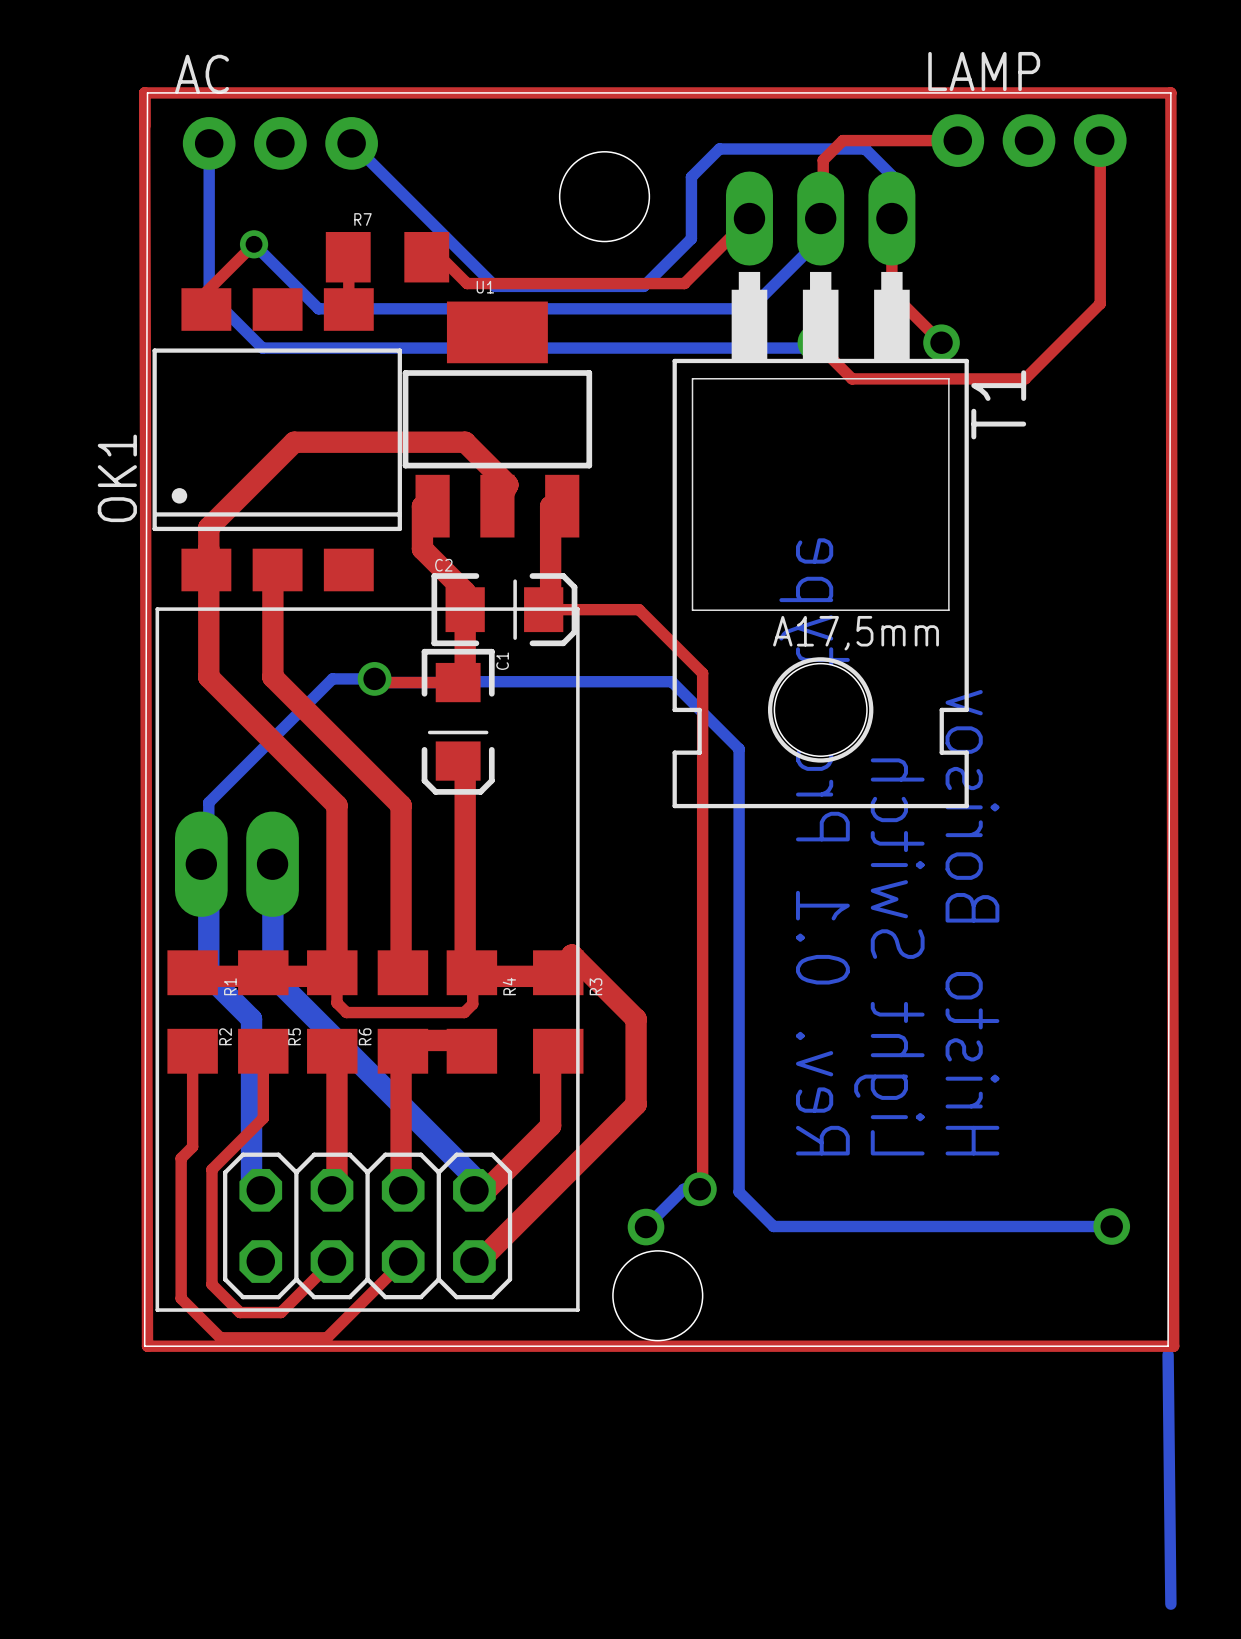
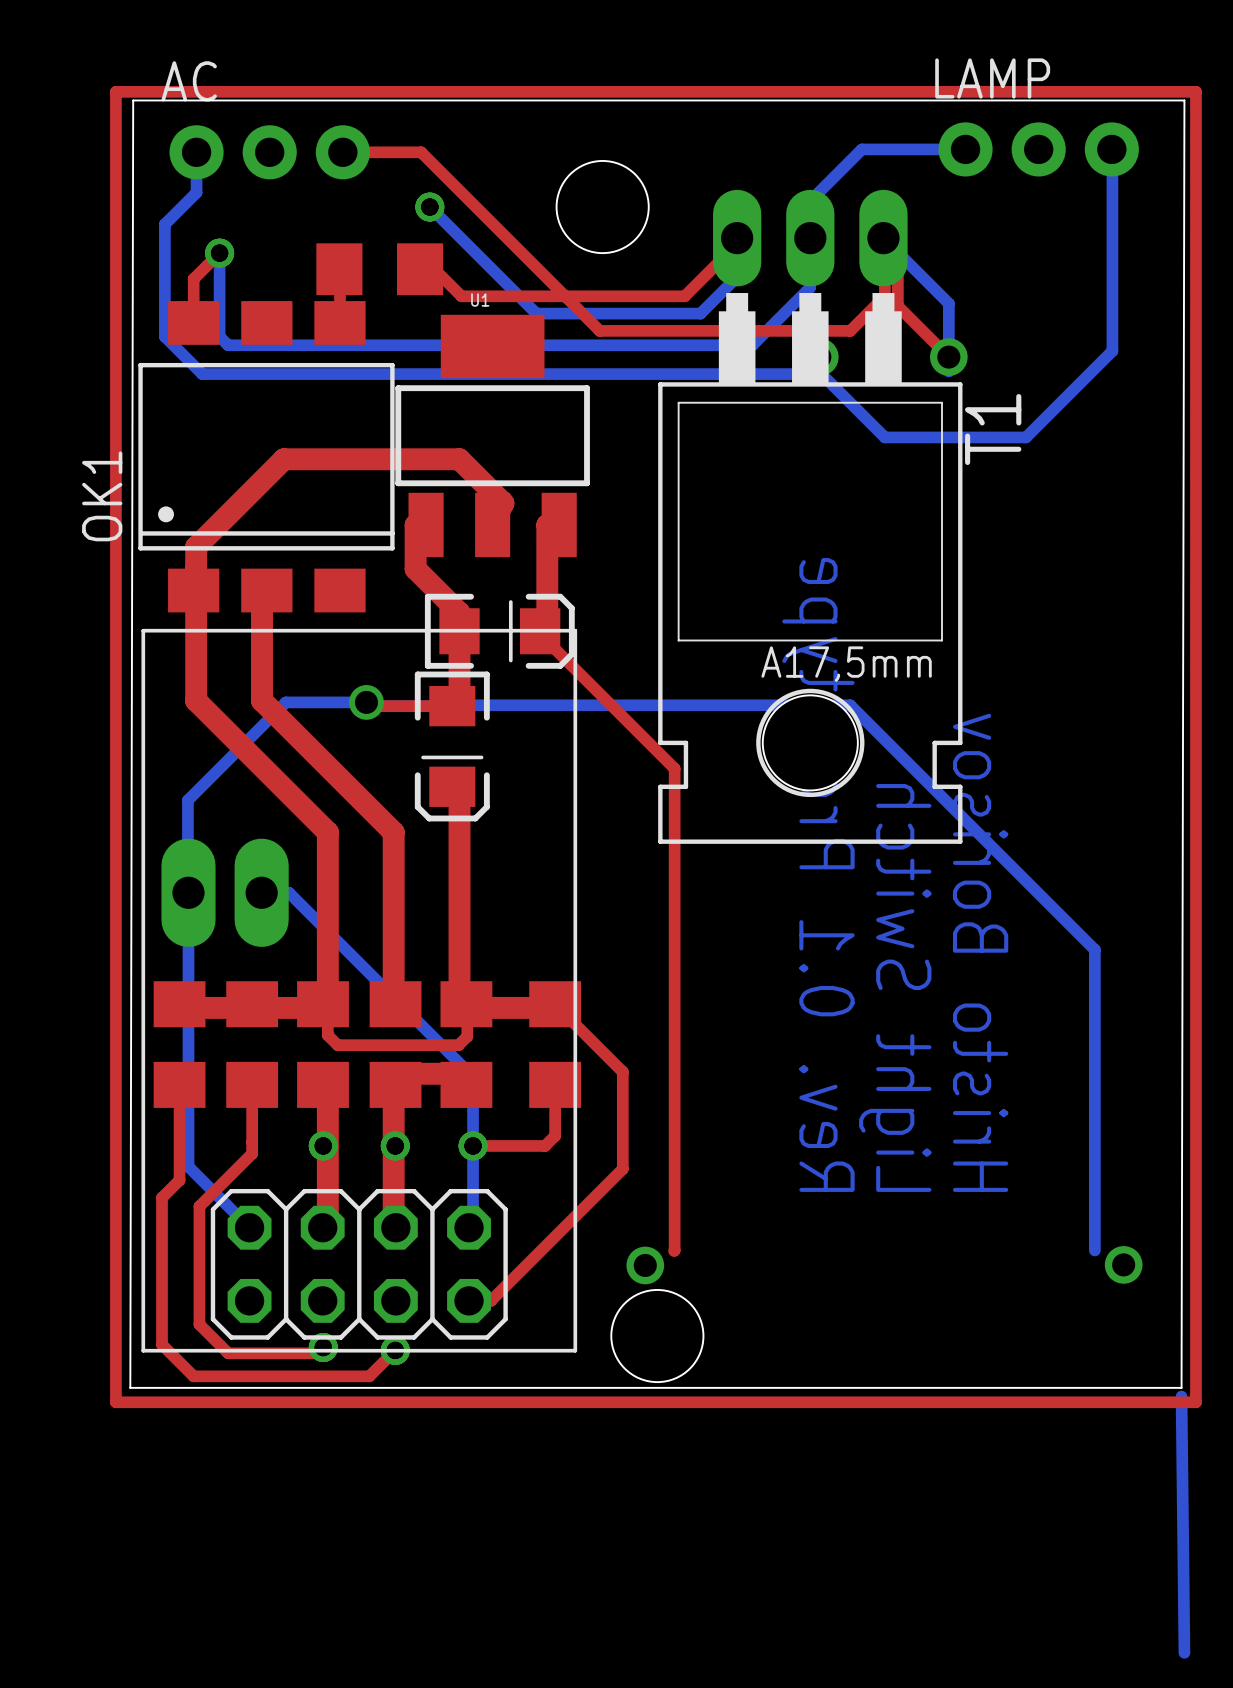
top track: (144, 92) (1170, 92) (1173, 1346) (147, 1346) (144, 92) -> (115, 91) (115, 1402) (1195, 1402) (1195, 91) (115, 91)
top track: (957, 140) (842, 140) (823, 160) (823, 216) (820, 218) -> none
bottom track: none -> (965, 149) (861, 149) (810, 200) (810, 238)
top track: (1100, 140) (1100, 303) (1025, 378) (852, 378) (815, 342) -> none
top track: none -> (342, 152) (421, 152) (599, 330) (850, 330) (884, 296) (883, 238)
bottom track: (351, 143) (495, 286) (643, 286) (691, 238) (691, 177) (719, 149) (865, 149) (893, 177) (891, 218) -> none
bottom track: (209, 182) (209, 294) (262, 348) (810, 348) (815, 342) -> (196, 192) (164, 224) (164, 336) (202, 374) (817, 374) (819, 371) (884, 437) (1026, 437) (1112, 351) (1111, 149)
bottom track: none -> (429, 207) (536, 313) (700, 313) (737, 277) (737, 238)
via: none -> (429, 207)
bottom track: (820, 218) (820, 238) (750, 308) (318, 308) (254, 244) -> none
R7 name: R7 (362, 219) -> none
bottom track: none -> (883, 238) (948, 303) (948, 371)
bottom track: none -> (810, 238) (810, 287) (752, 345) (228, 345) (219, 336) (219, 253)
top track: (254, 244) (206, 291) -> (219, 253) (193, 279) (193, 304)
via position: (254, 244) -> (219, 253)
T1 position: (820, 489) -> (810, 516)
C2 name: C2 (443, 565) -> none
top track: (543, 609) (639, 609) (702, 673) (702, 1186) (699, 1189) -> (540, 631) (540, 634) (674, 768) (674, 1251)
C1 name: C1 (502, 661) -> none
bottom track: (332, 678) (208, 802) (208, 869) -> none
bottom track: (671, 681) (739, 749) (739, 1192) (773, 1226) (1111, 1226) -> (671, 705) (850, 705) (1094, 949) (1094, 1250)
bottom track: (272, 864) (272, 976) (486, 1189) (474, 1190) -> (261, 892) (289, 892) (473, 1076) (473, 1223) (469, 1227)
bottom track: (208, 869) (208, 976) (251, 1019) (251, 1189) (260, 1190) -> (323, 702) (285, 702) (187, 800) (188, 1166) (249, 1227)
top track: (558, 972) (571, 954) (636, 1019) (636, 1104) (486, 1254) (474, 1261) -> (555, 1004) (622, 1071) (622, 1168) (490, 1300) (469, 1300)
R1 name: R1 (230, 986) -> none
R4 name: R4 (509, 986) -> none
R3 name: R3 (596, 986) -> none
R2 name: R2 (225, 1036) -> none
R5 name: R5 (294, 1036) -> none
R6 name: R6 (365, 1036) -> none
top track: (558, 1051) (550, 1061) (550, 1125) (486, 1189) (474, 1190) -> (555, 1084) (555, 1135) (545, 1145) (473, 1145)
via: none -> (323, 1145)
via: none -> (395, 1145)
via: none -> (473, 1145)
top track: (192, 1144) (192, 1146) (181, 1158) (181, 1298) (220, 1337) (326, 1337) (403, 1261) -> (179, 1180) (162, 1197) (162, 1344) (193, 1376) (369, 1376) (395, 1350)
bottom track: (699, 1189) (683, 1189) (646, 1227) -> none
via: (699, 1189) -> none
top track: (331, 1261) (280, 1312) -> (323, 1347) (317, 1353) (270, 1353)
via: none -> (323, 1347)
via: none -> (395, 1350)

